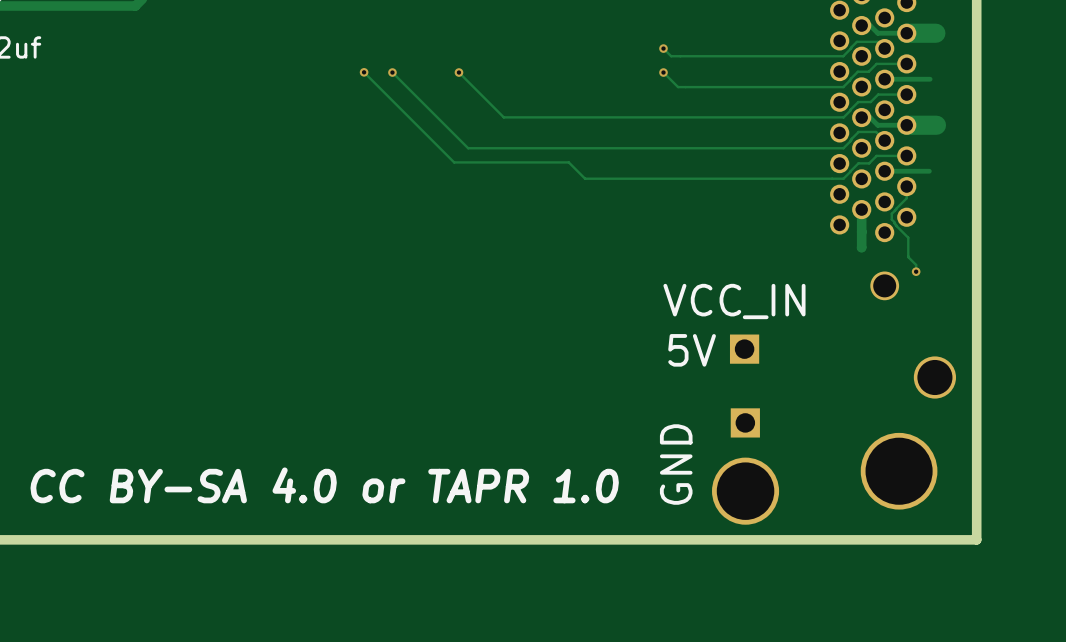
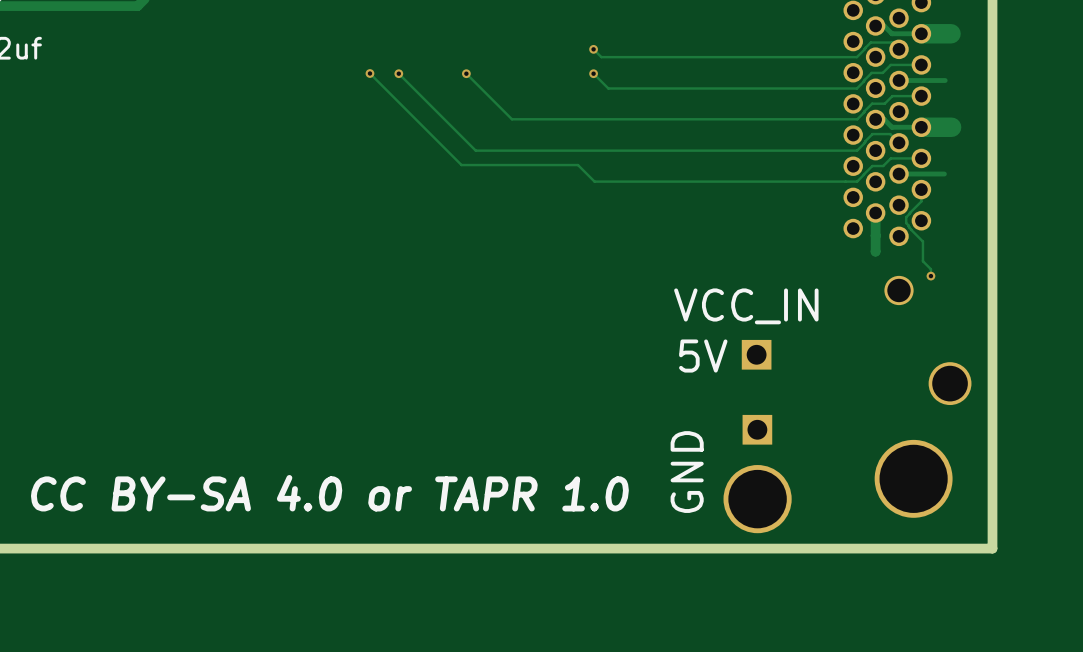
via: none -> (593, 49)
track: (663, 48) (671, 56) -> (593, 49) (601, 57) (682, 57)
via: (663, 48) -> none
via: none -> (593, 73)
track: (663, 72) (678, 87) -> (593, 73) (608, 88) (689, 88)
via: (663, 72) -> none

